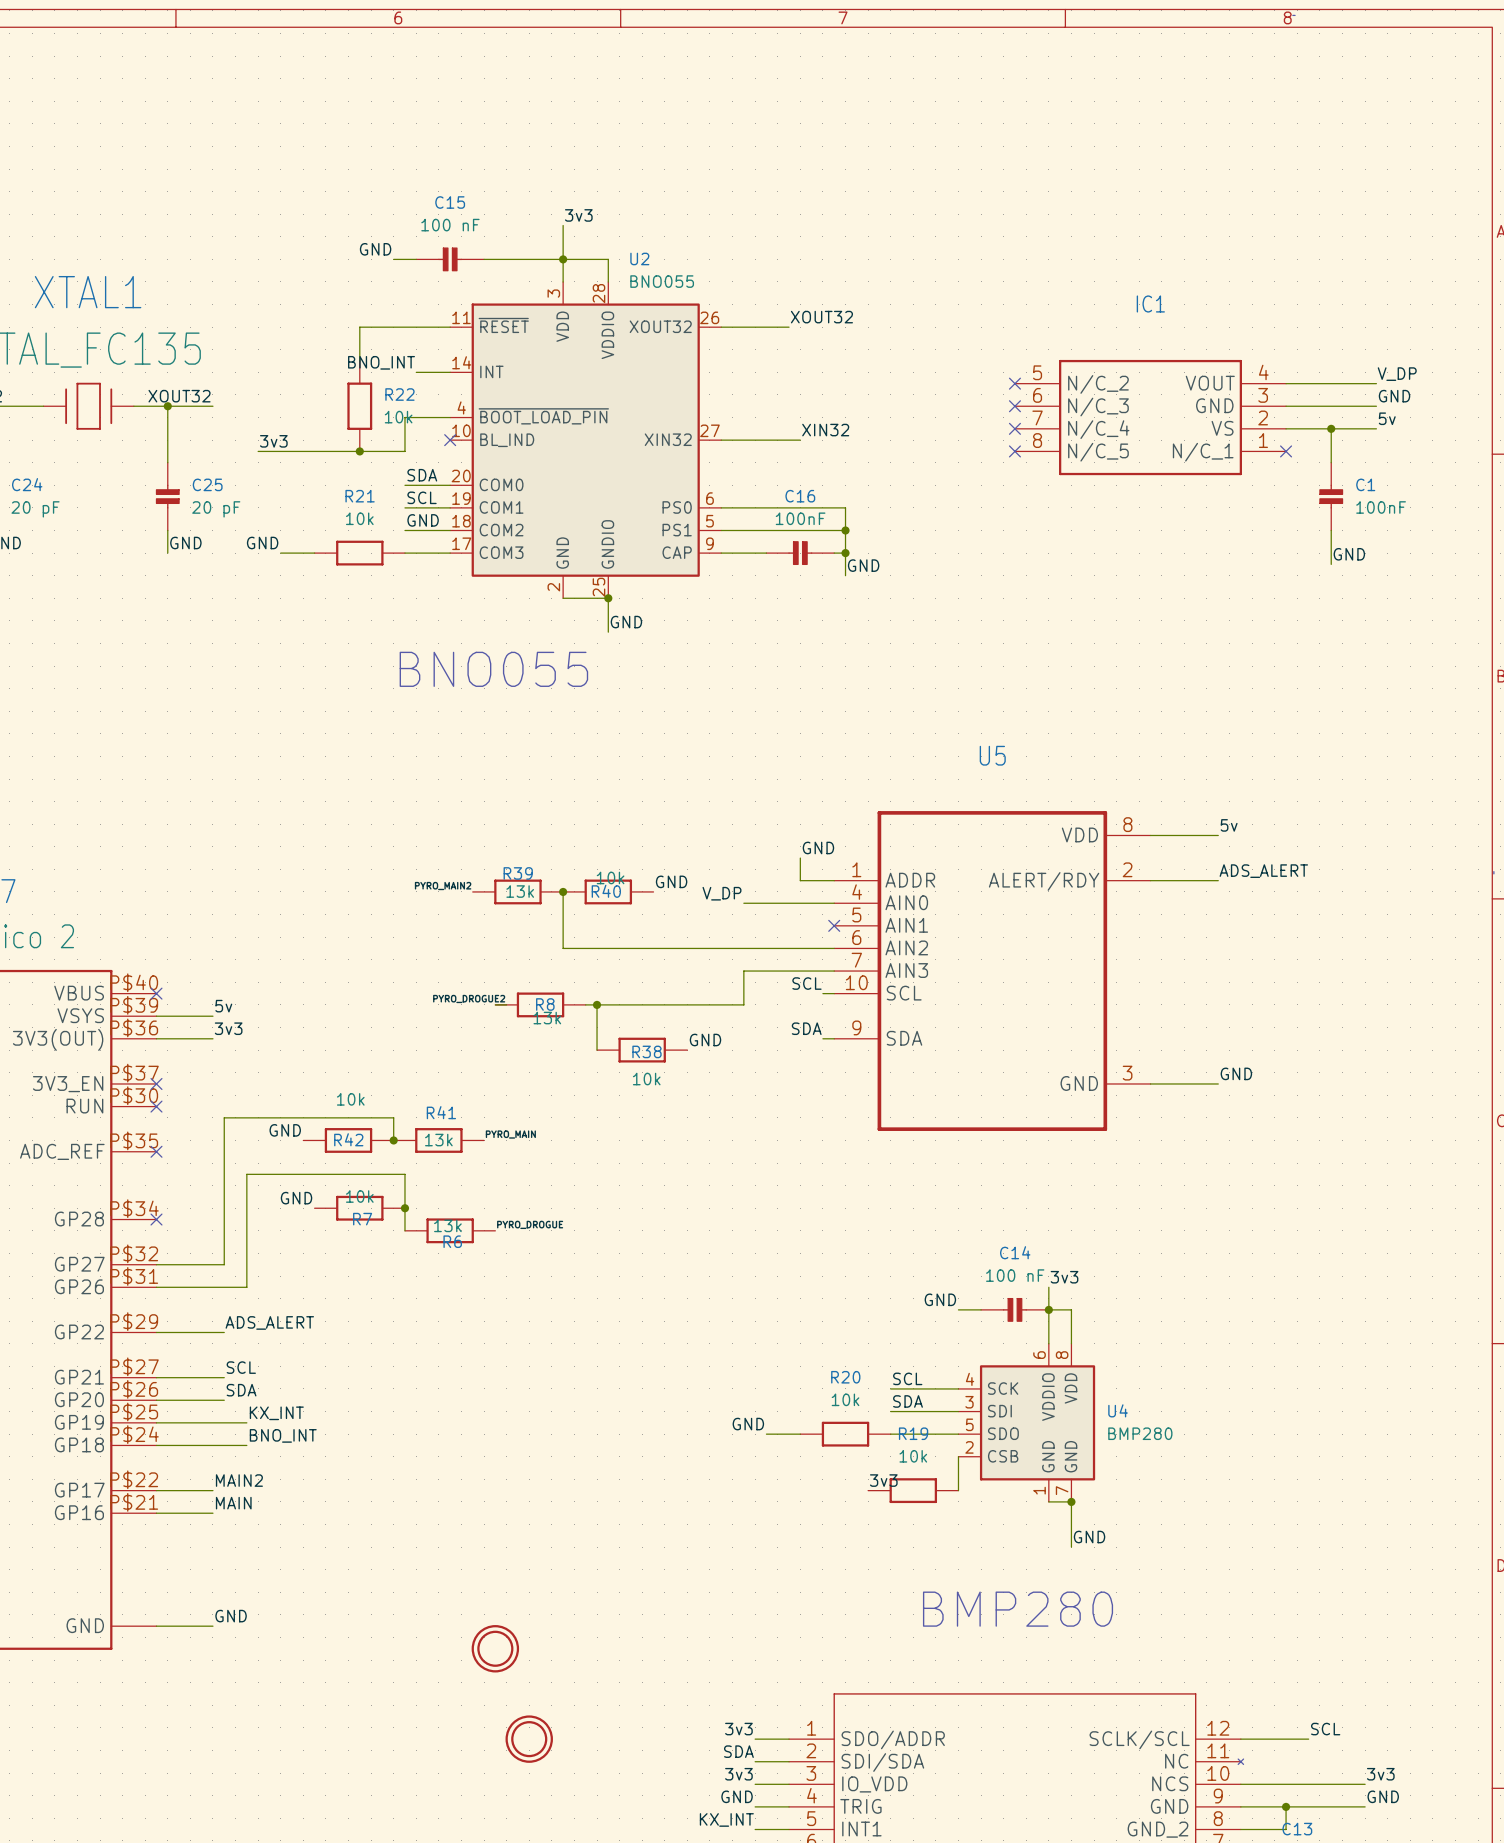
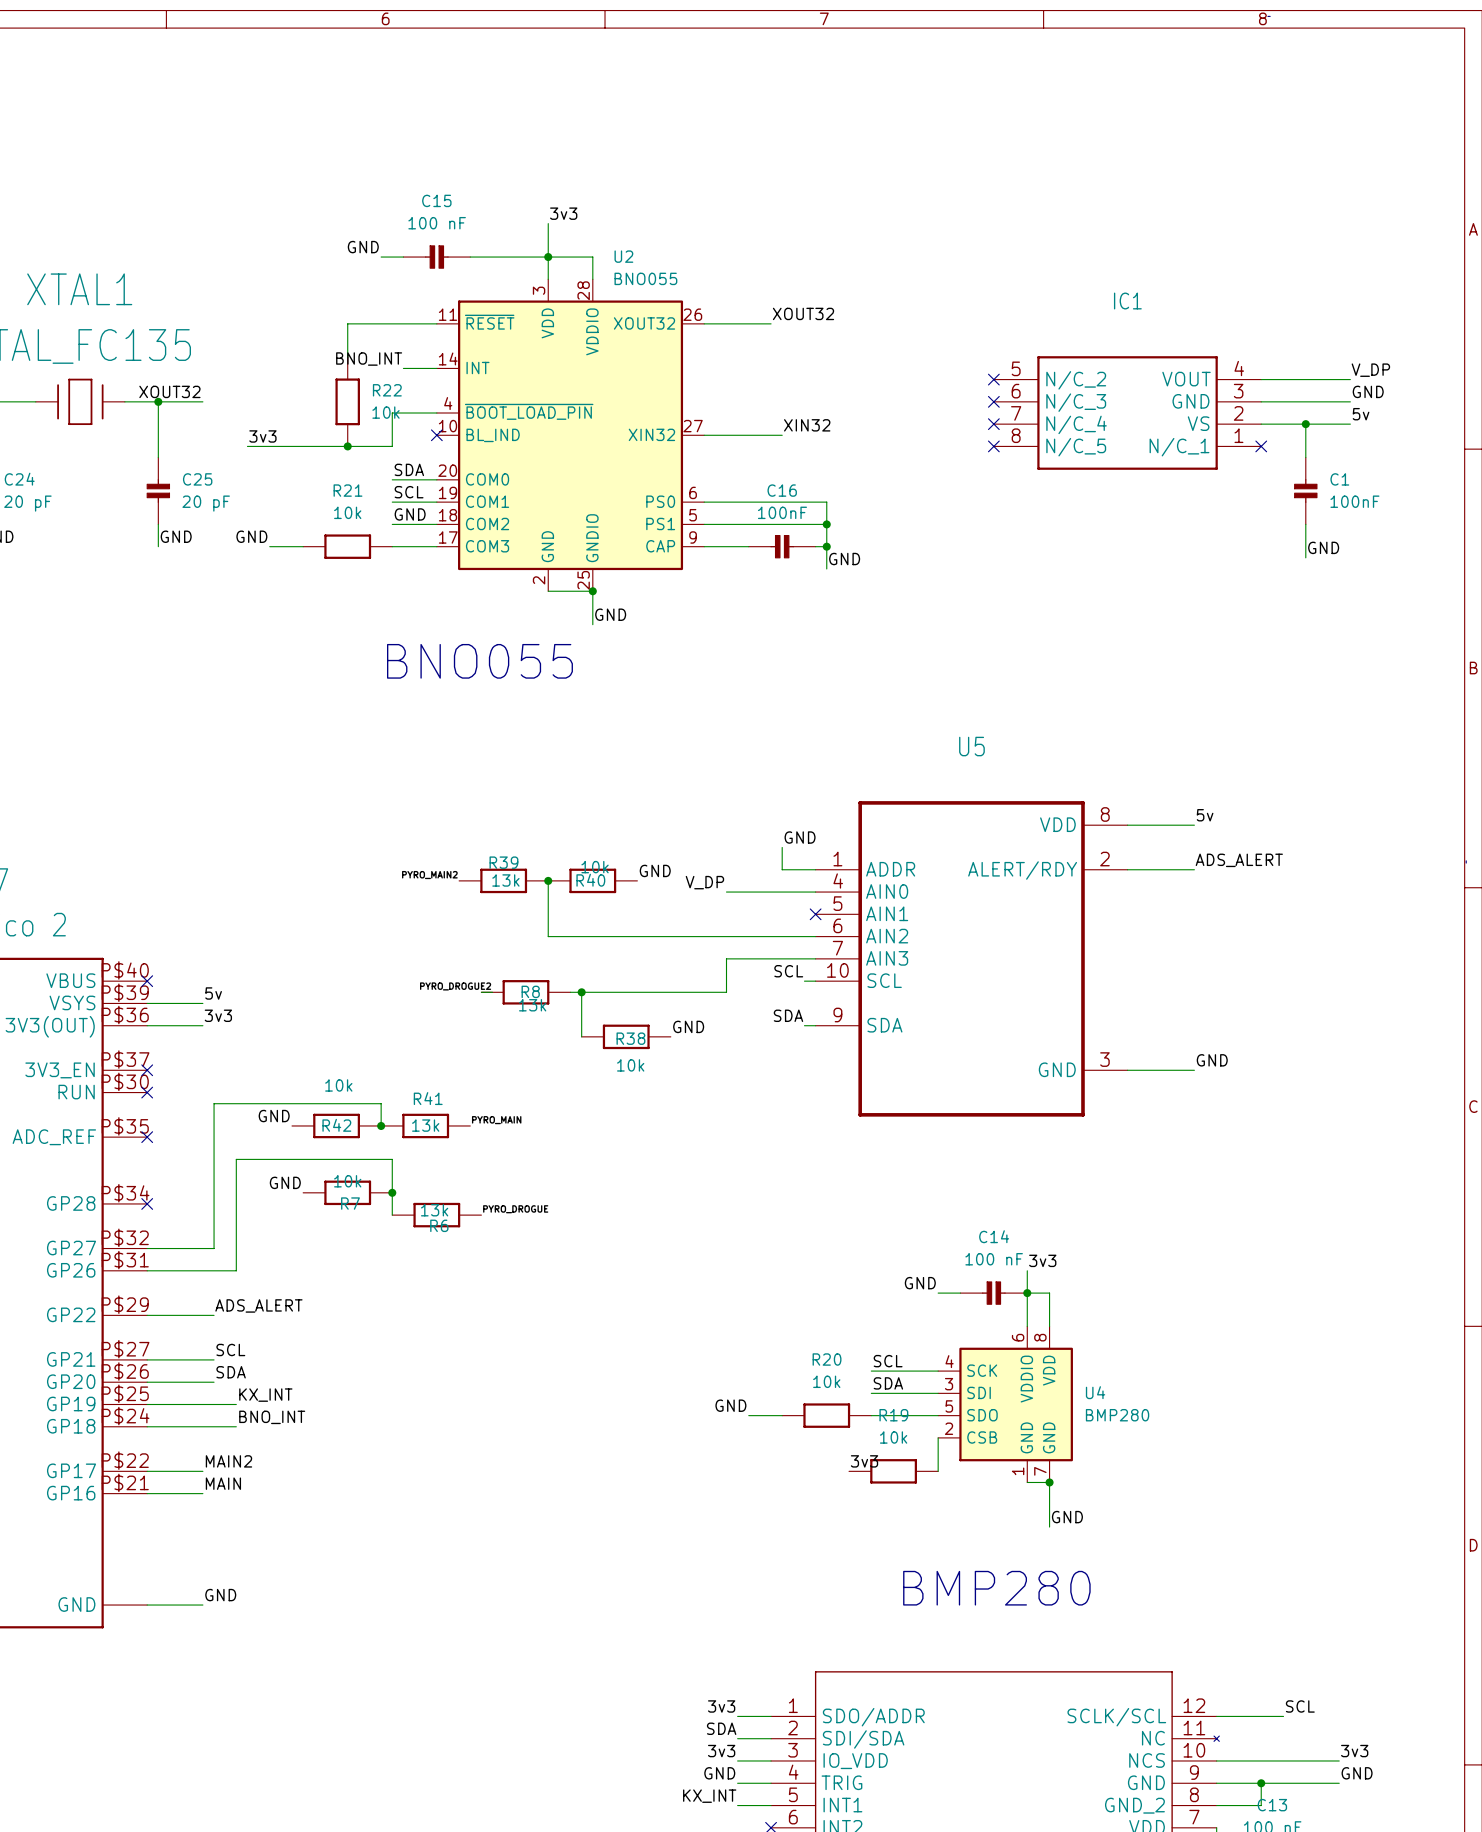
part: (495, 1648) -> none
part: (529, 1739) -> none

